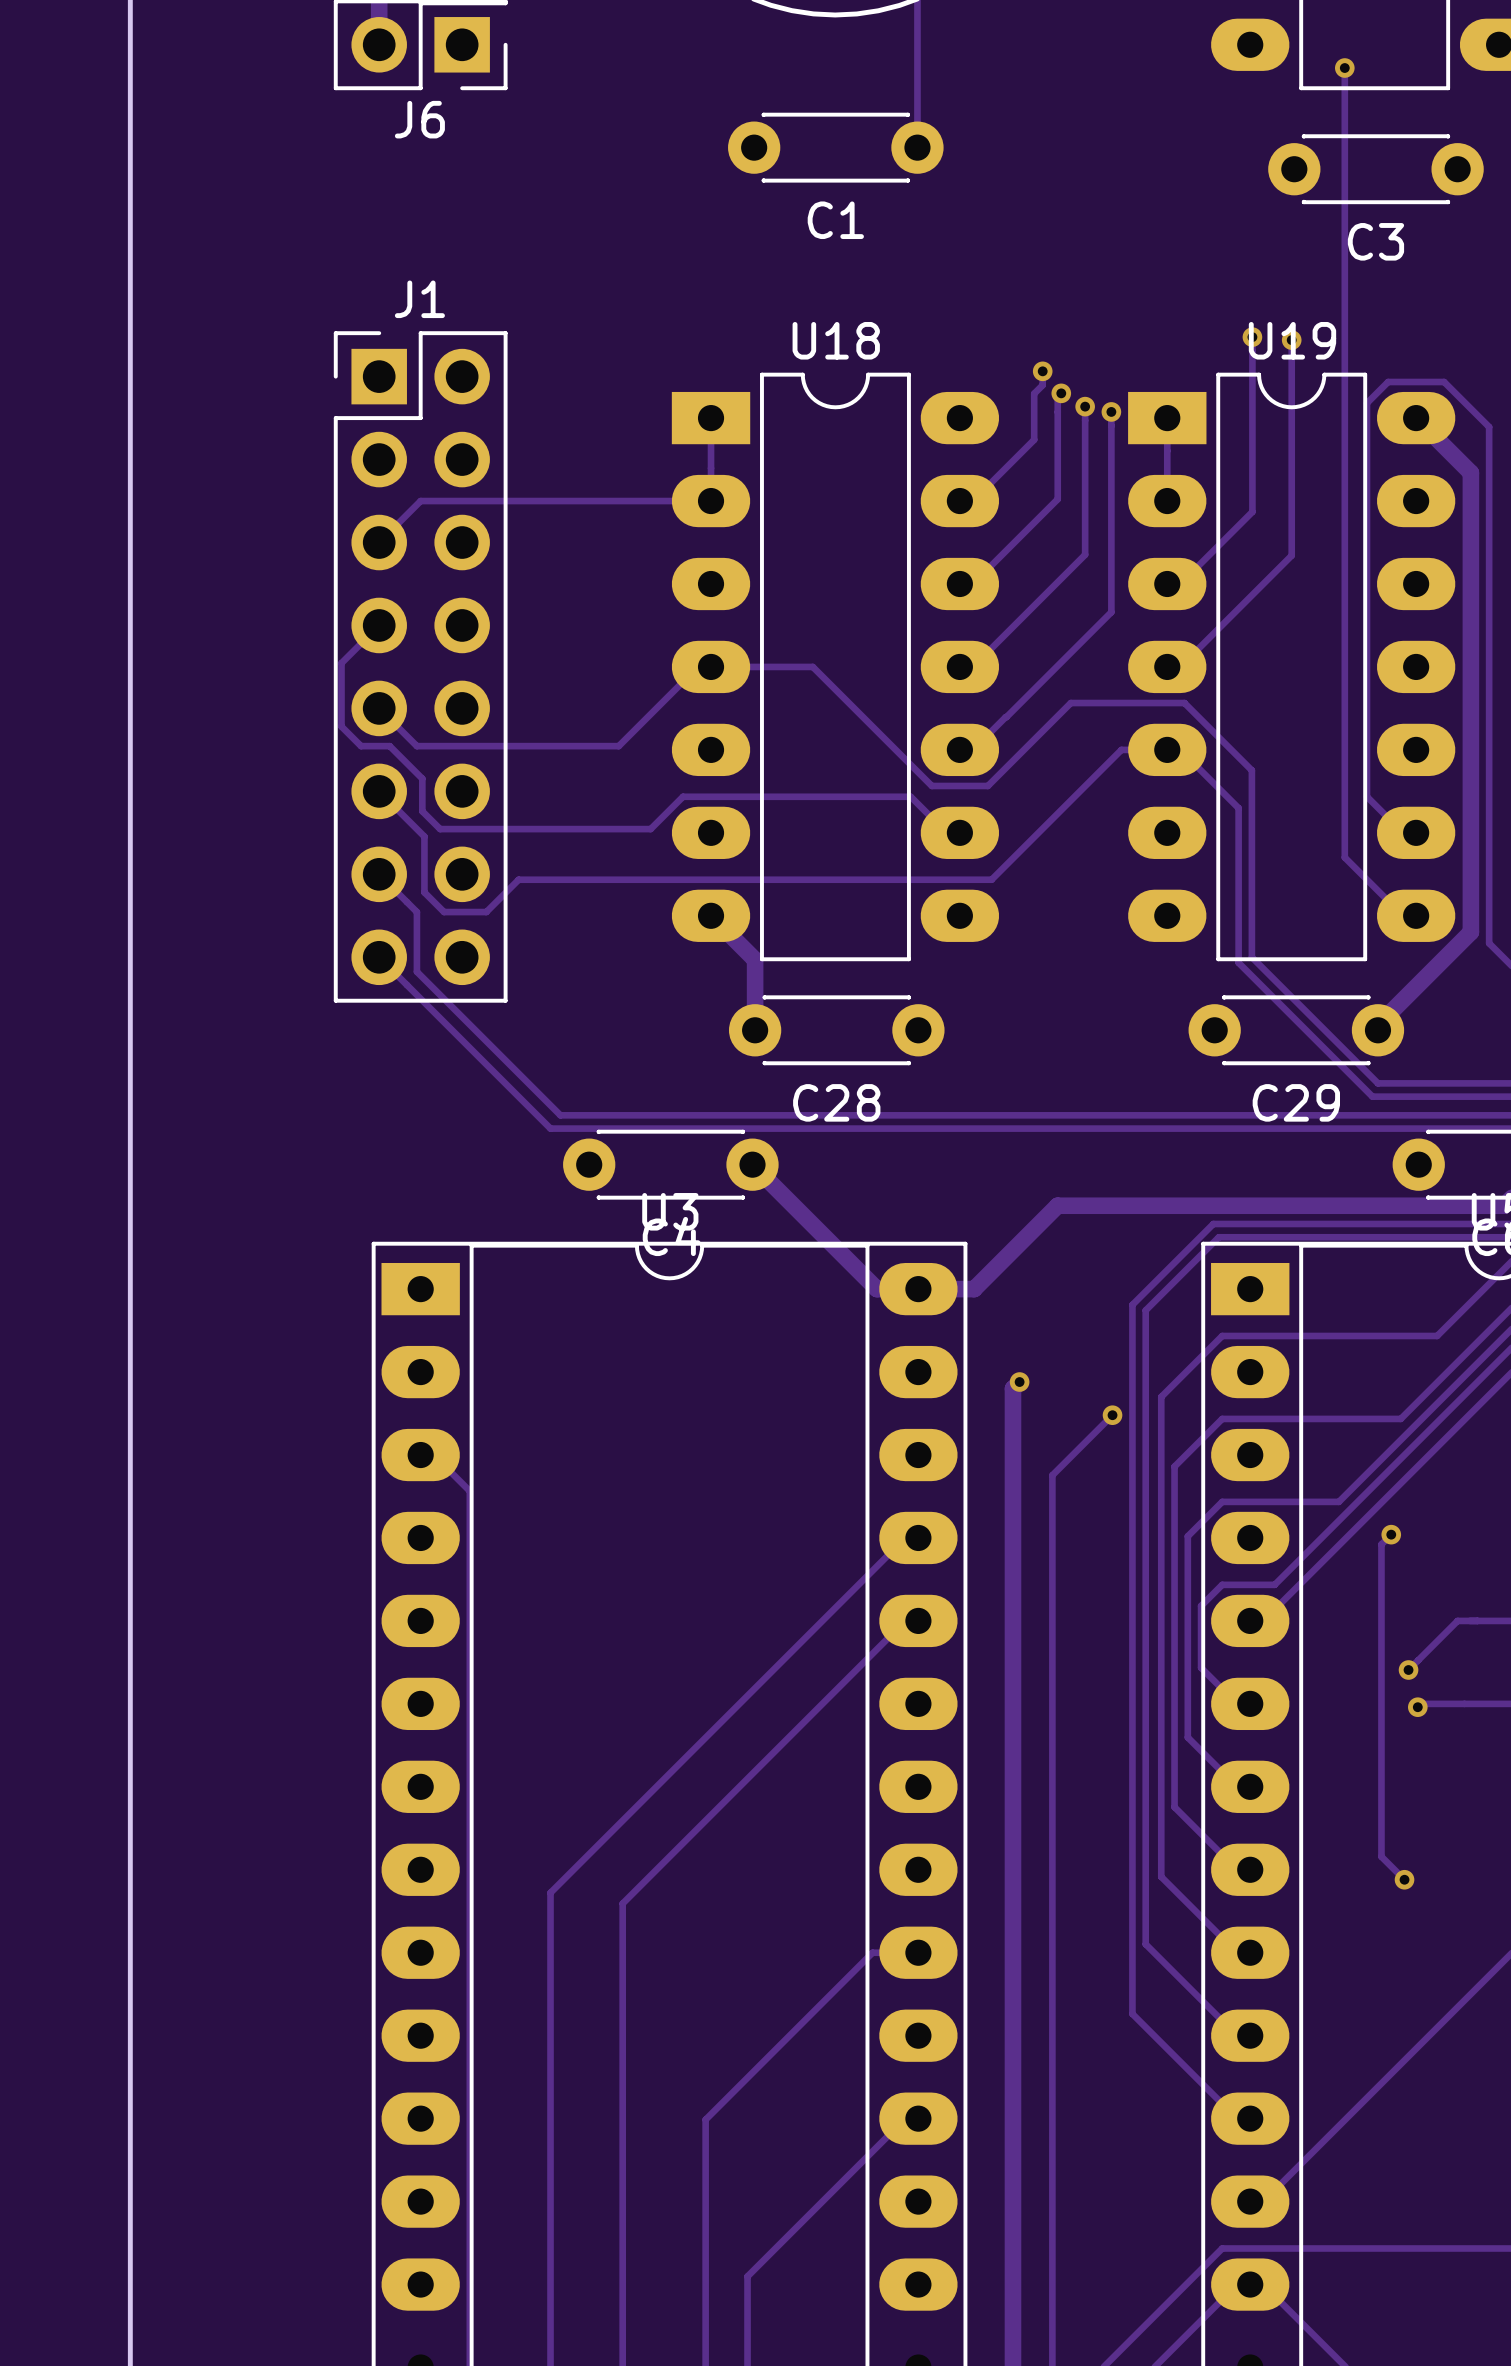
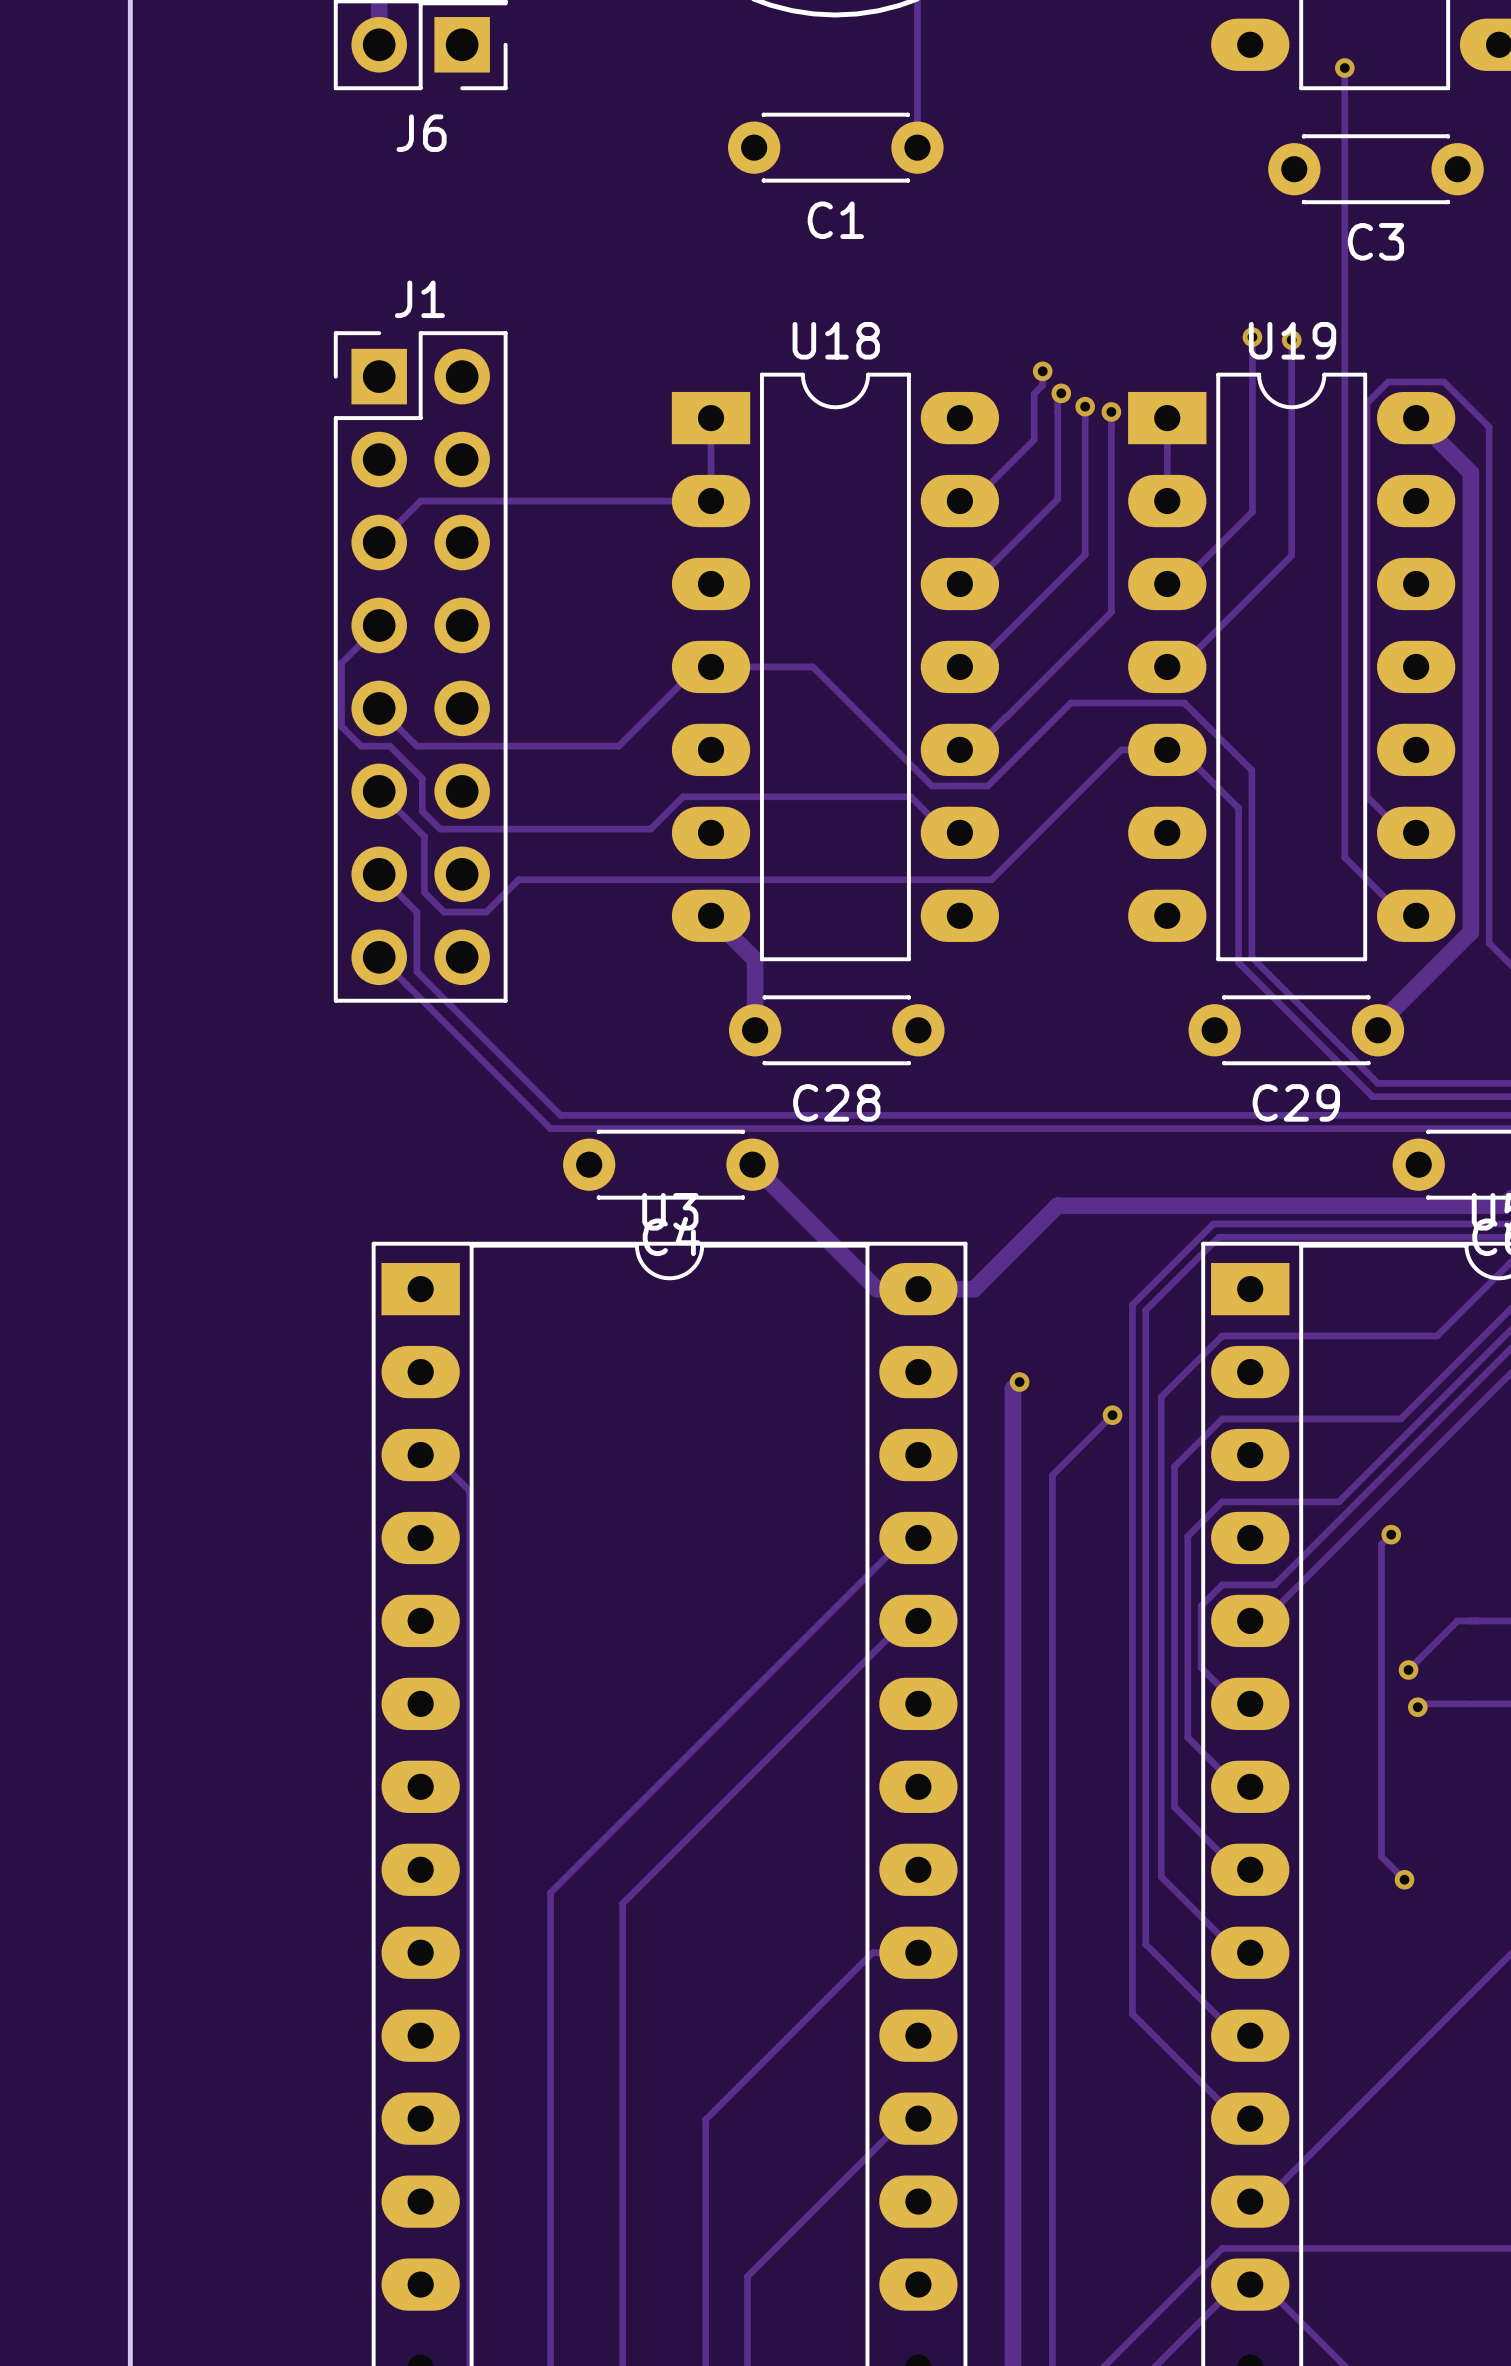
J6 name position: J6 (419, 119) -> J6 (421, 133)

